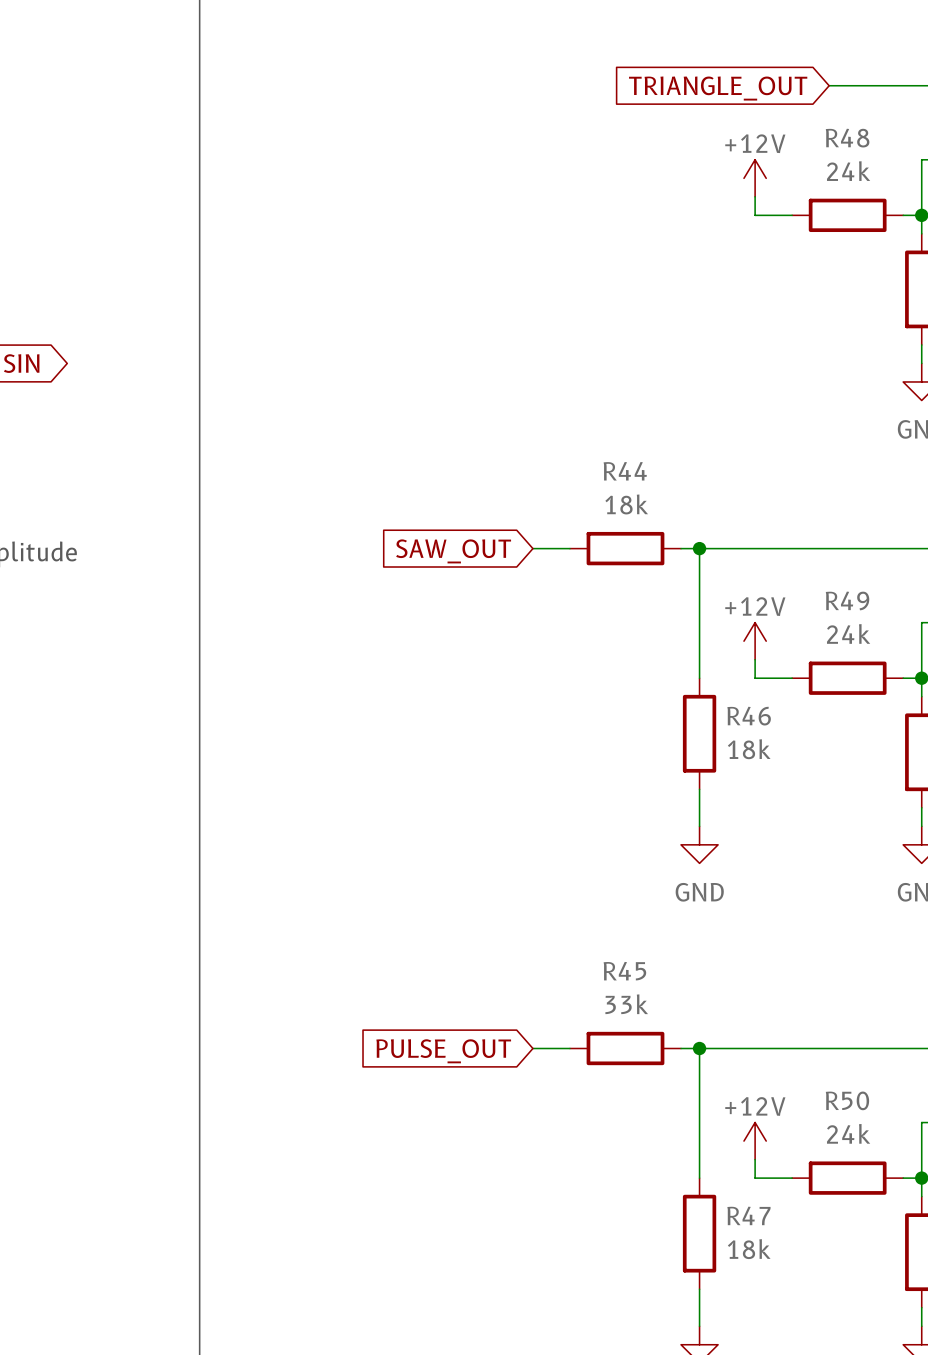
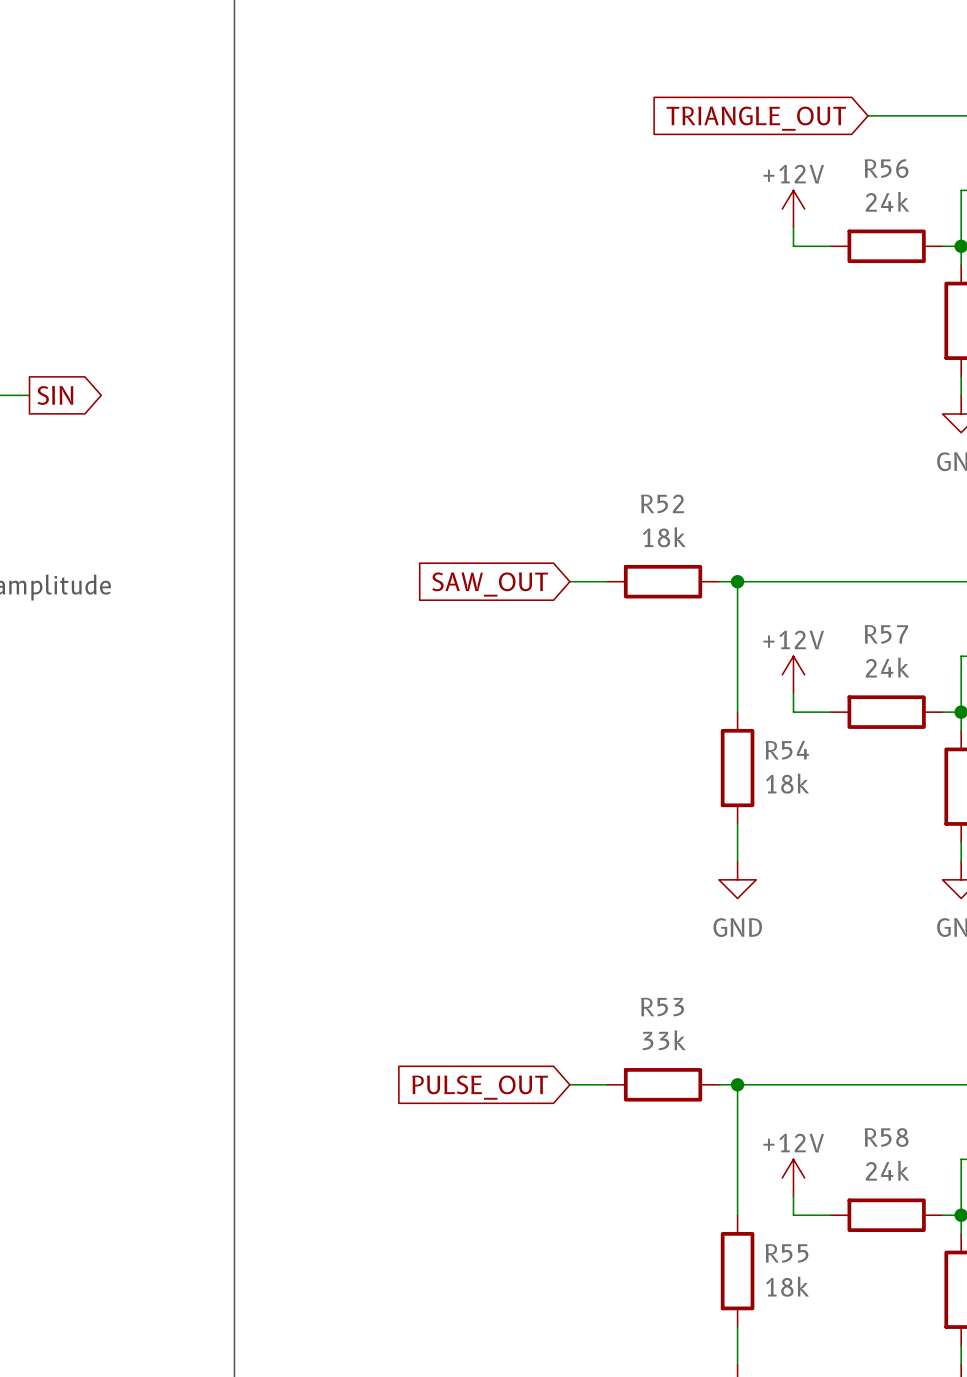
R48 name: R48 (847, 138) -> R56 (886, 168)
R44 name: R44 (625, 471) -> R52 (662, 503)
R49 name: R49 (847, 600) -> R57 (886, 634)
R46 name: R46 (749, 716) -> R54 (787, 750)
R45 name: R45 (624, 971) -> R53 (662, 1007)
R50 name: R50 (847, 1100) -> R58 (886, 1137)
R47 name: R47 (748, 1215) -> R55 (786, 1253)

